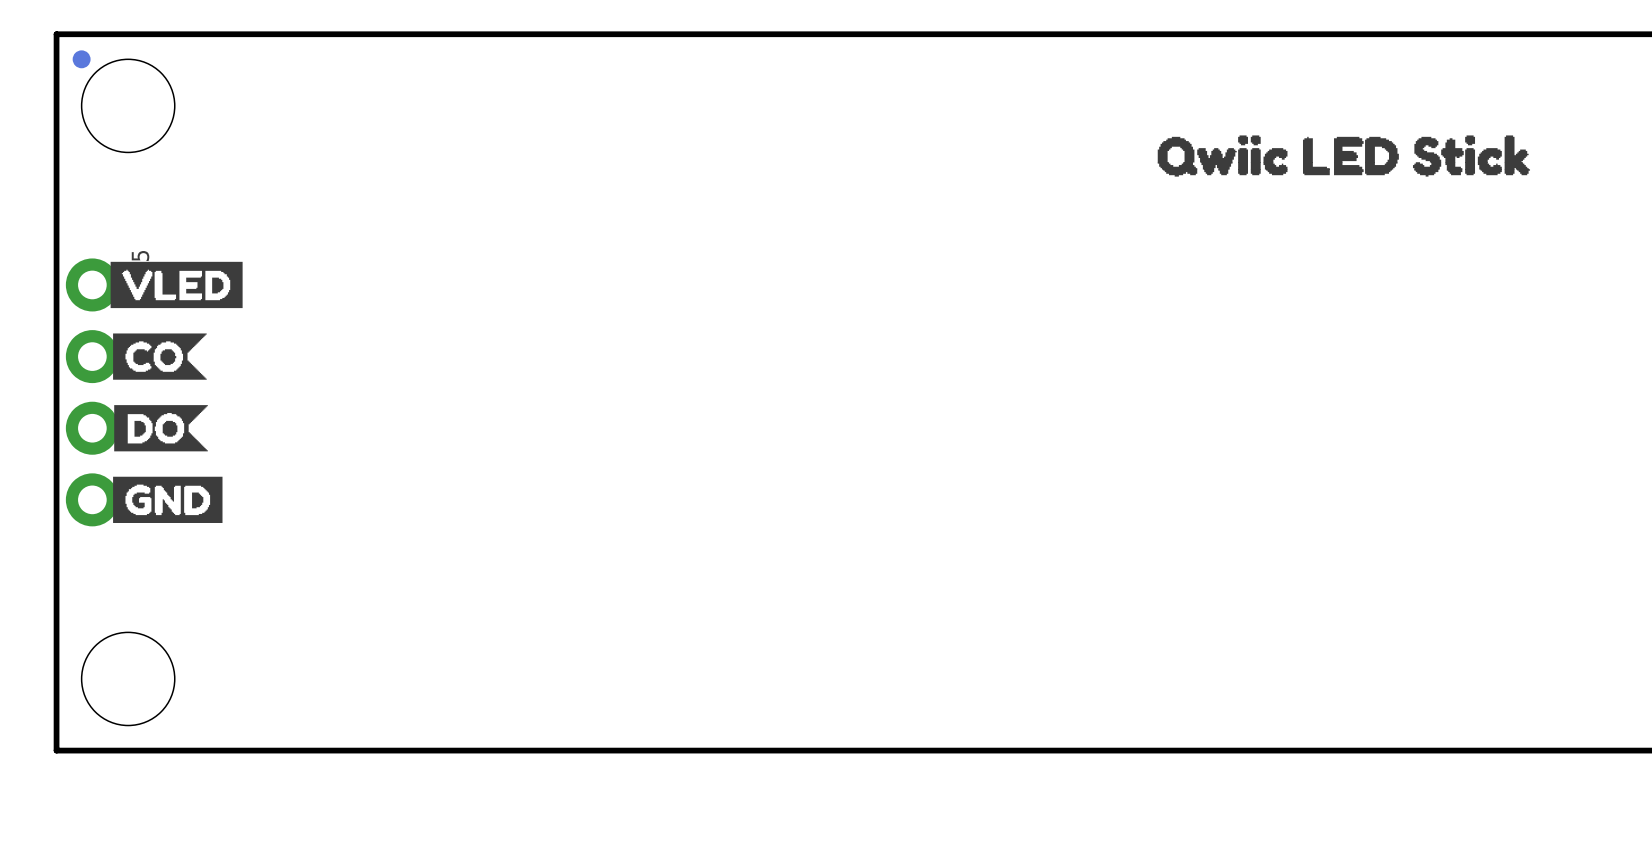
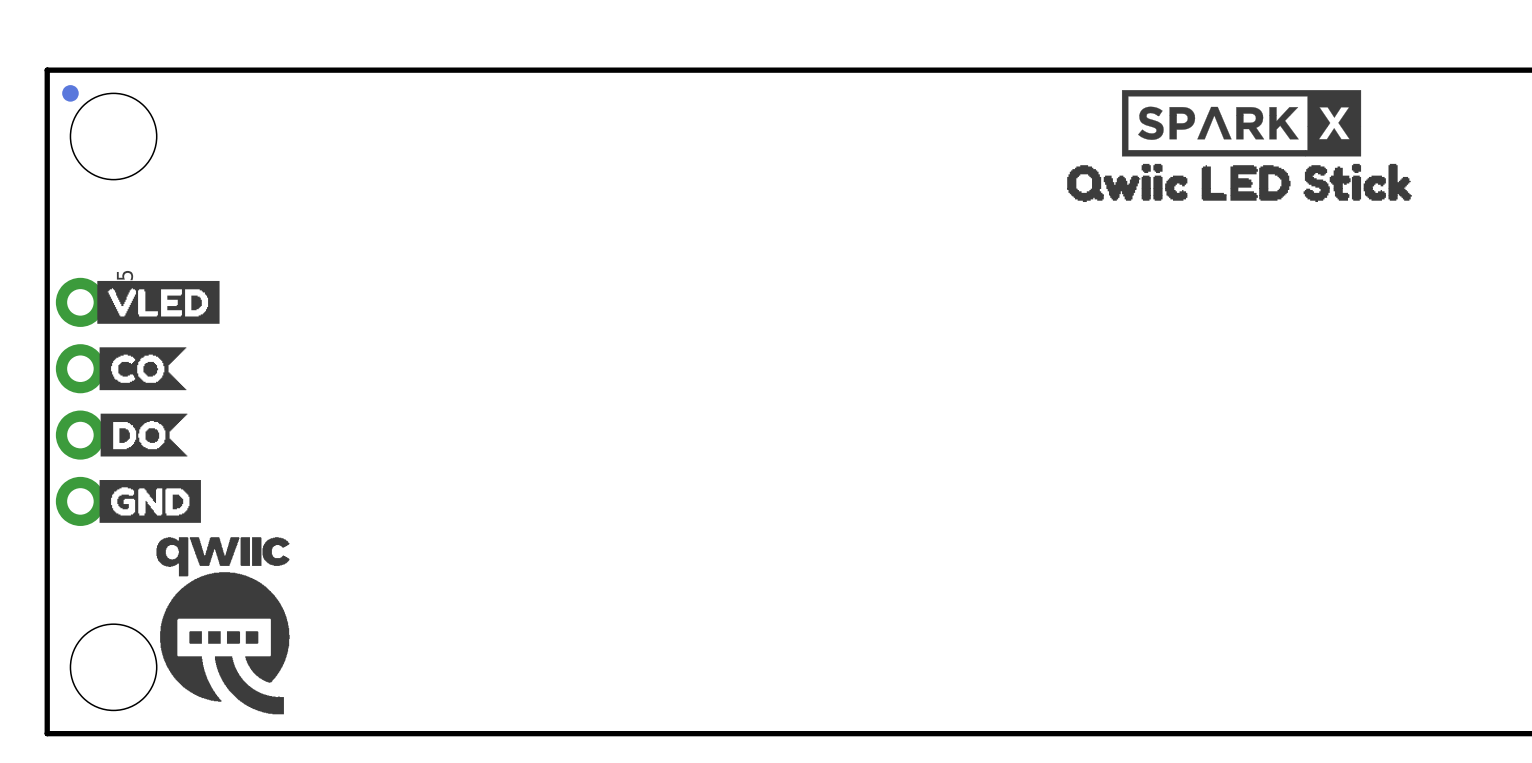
drawing: none -> [1121, 90, 1362, 157]
drawing: none -> [156, 537, 290, 715]

